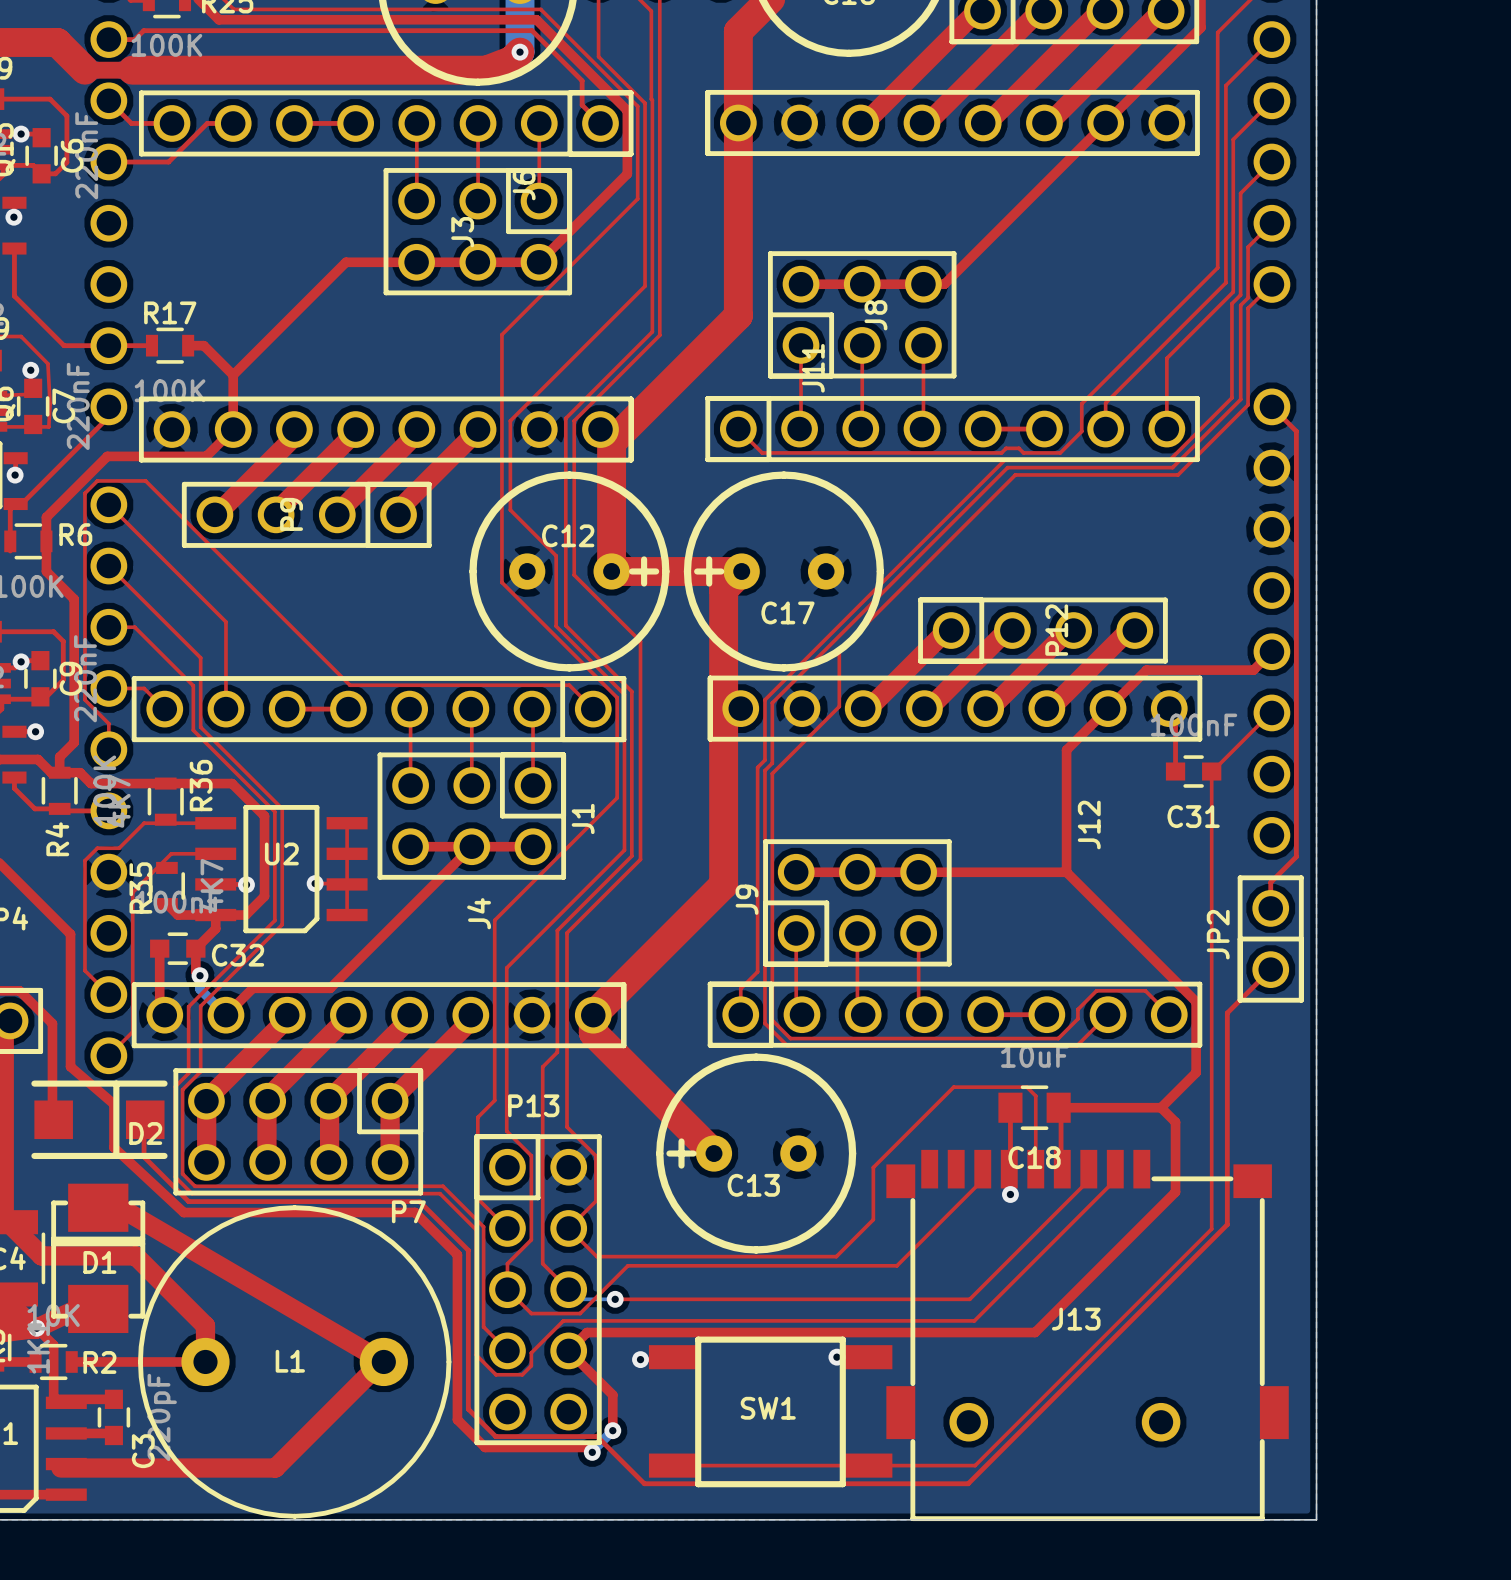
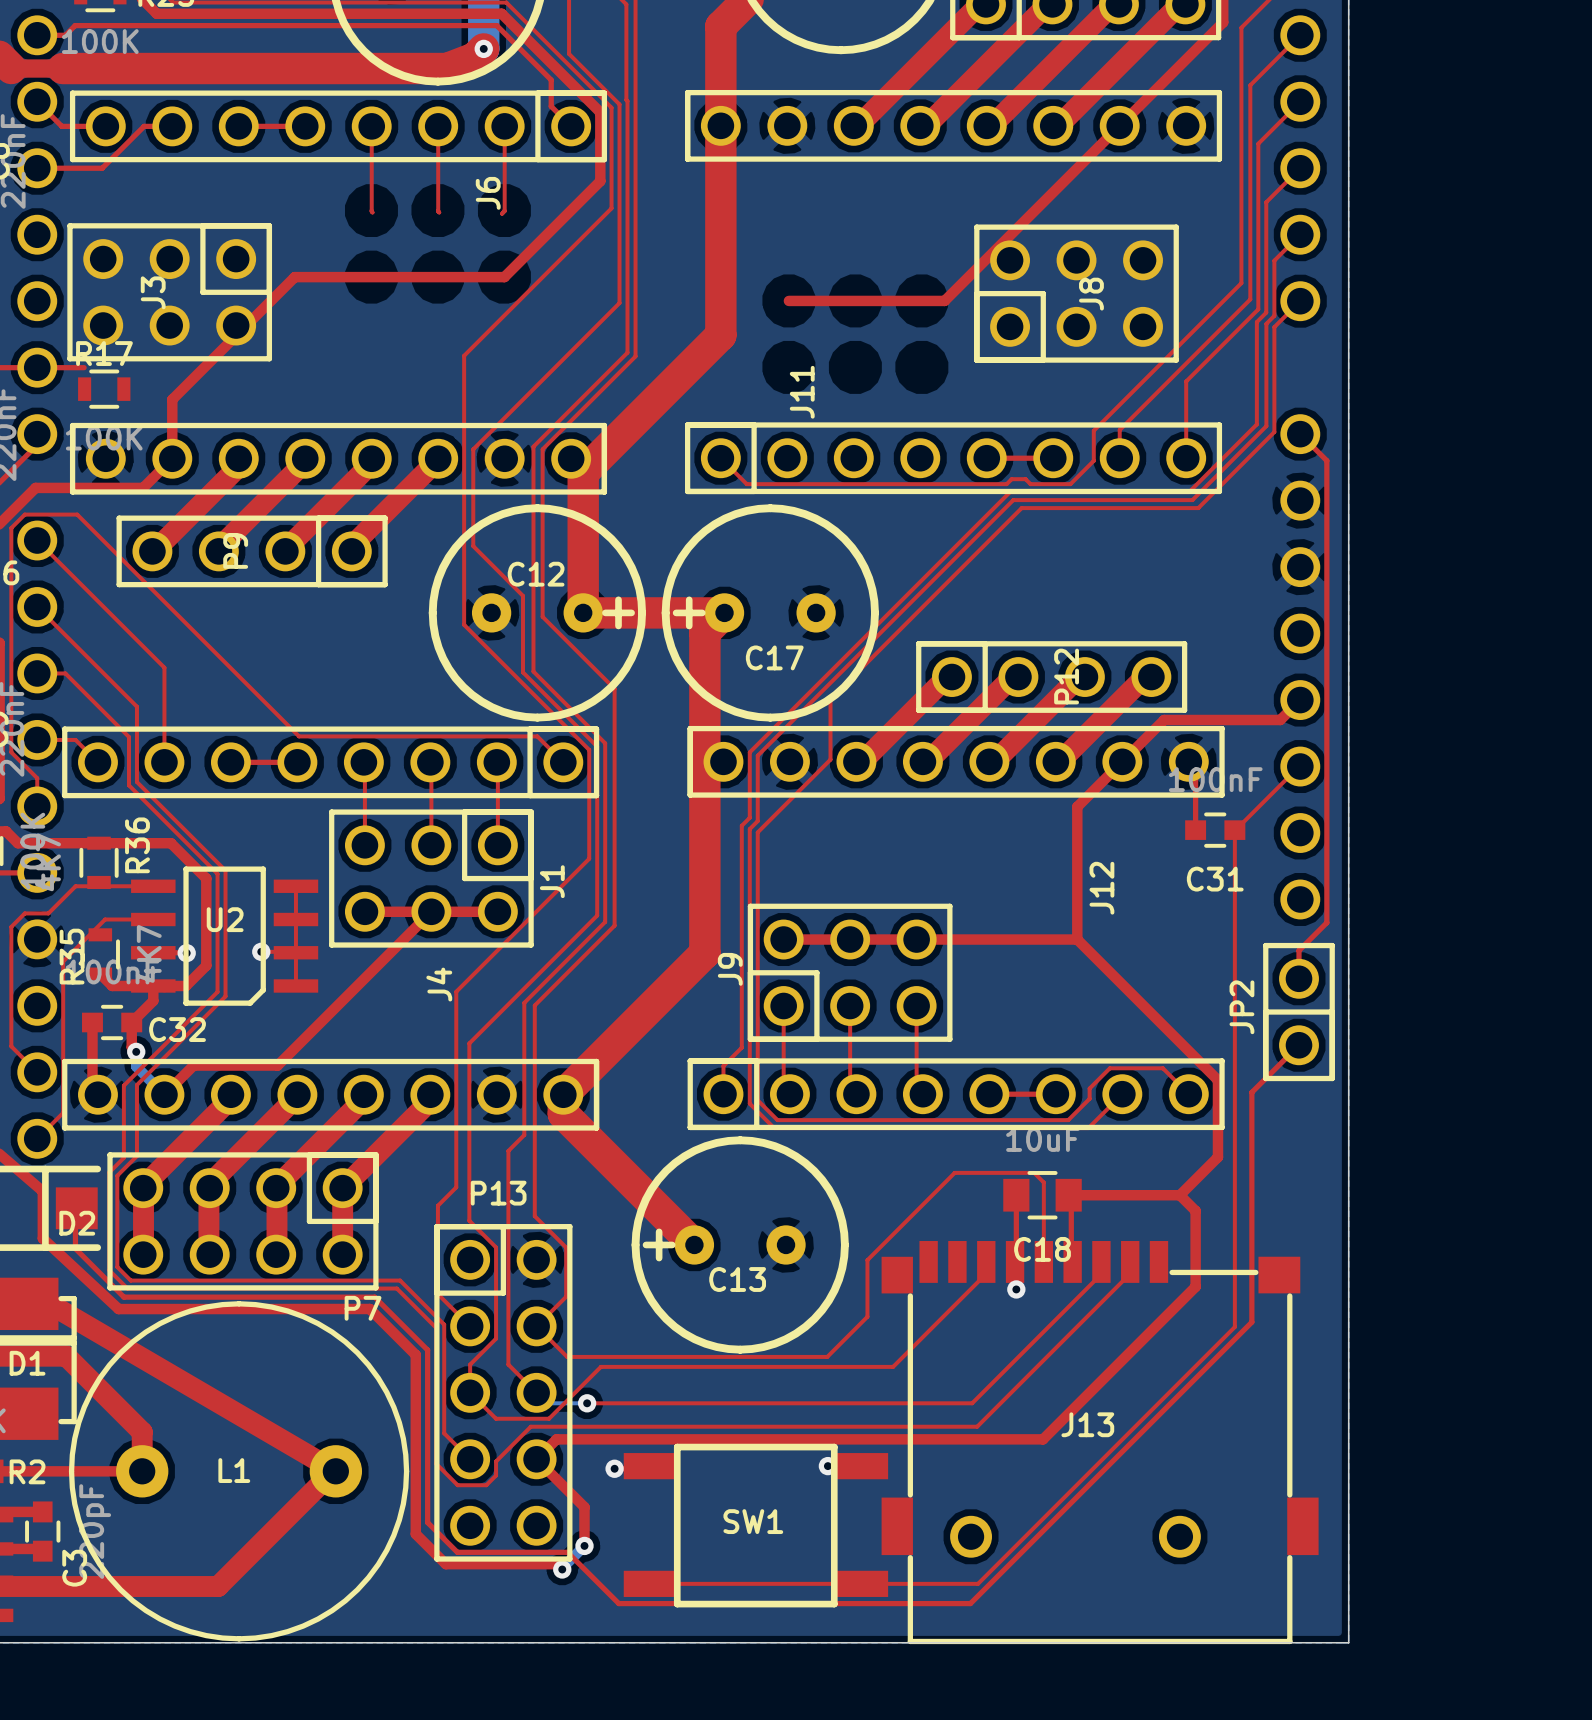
J3 position: (477, 231) -> (169, 292)
J8 position: (862, 314) -> (1076, 293)
R17 position: (170, 345) -> (104, 389)
top track: (188, 345) (203, 345) (233, 375) -> none
top track: (801, 345) (801, 429) -> none
top track: (862, 345) (862, 426) -> none
top track: (923, 345) (923, 428) -> none

